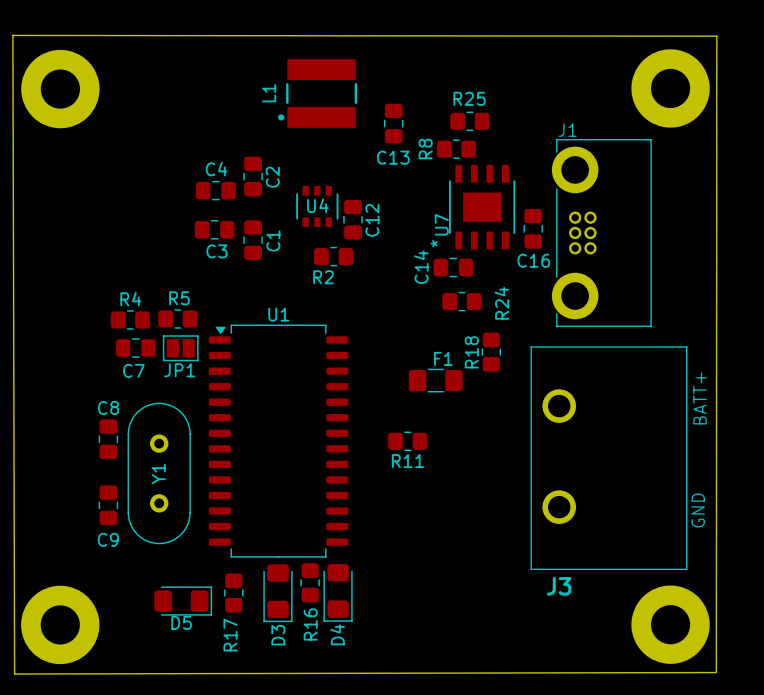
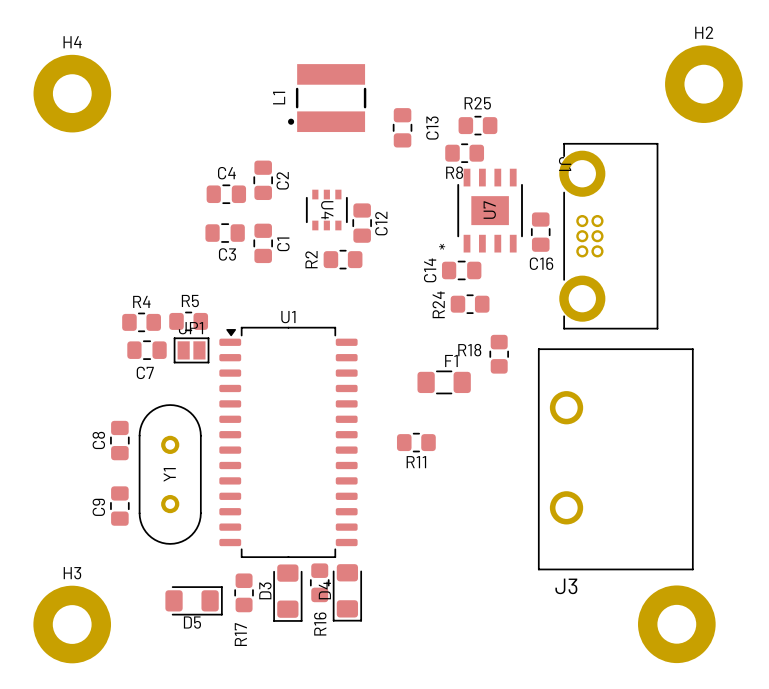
board edge: (12, 35) (14, 674) (716, 672) (716, 36) (12, 35) -> none
H4 name: none -> H4 (72, 42)
H2: none -> (703, 84)
part: (670, 88) -> none
J1 name rotation: 0° (567, 130) -> 90° clockwise (565, 164)
J1 name position: J1 (567, 130) -> J1 (565, 164)
R8 name rotation: 0° (425, 149) -> 90° clockwise (454, 172)
C13 name rotation: 0° (393, 157) -> 90° counterclockwise (432, 128)
C13 name position: C13 (393, 157) -> C13 (432, 128)
U4 name rotation: 0° (317, 205) -> 90° clockwise (327, 210)
U7 name position: U7 (441, 224) -> U7 (489, 210)
R2 name rotation: 0° (323, 277) -> 90° counterclockwise (311, 259)
R24 name position: R24 (501, 303) -> R24 (438, 304)
R18 name rotation: 0° (471, 352) -> 90° clockwise (469, 350)
JP1 name position: JP1 (179, 370) -> JP1 (190, 328)
text: BATT+ (700, 398) -> none
C8 name rotation: 0° (108, 408) -> 90° counterclockwise (98, 440)
C8 name position: C8 (108, 408) -> C8 (98, 440)
text: GND (698, 510) -> none
C9 name rotation: 0° (108, 539) -> 90° counterclockwise (98, 507)
C9 name position: C9 (108, 539) -> C9 (98, 507)
H3 name: none -> H3 (72, 573)
D4 name position: D4 (337, 634) -> D4 (324, 590)
D3 name position: D3 (278, 635) -> D3 (265, 590)

